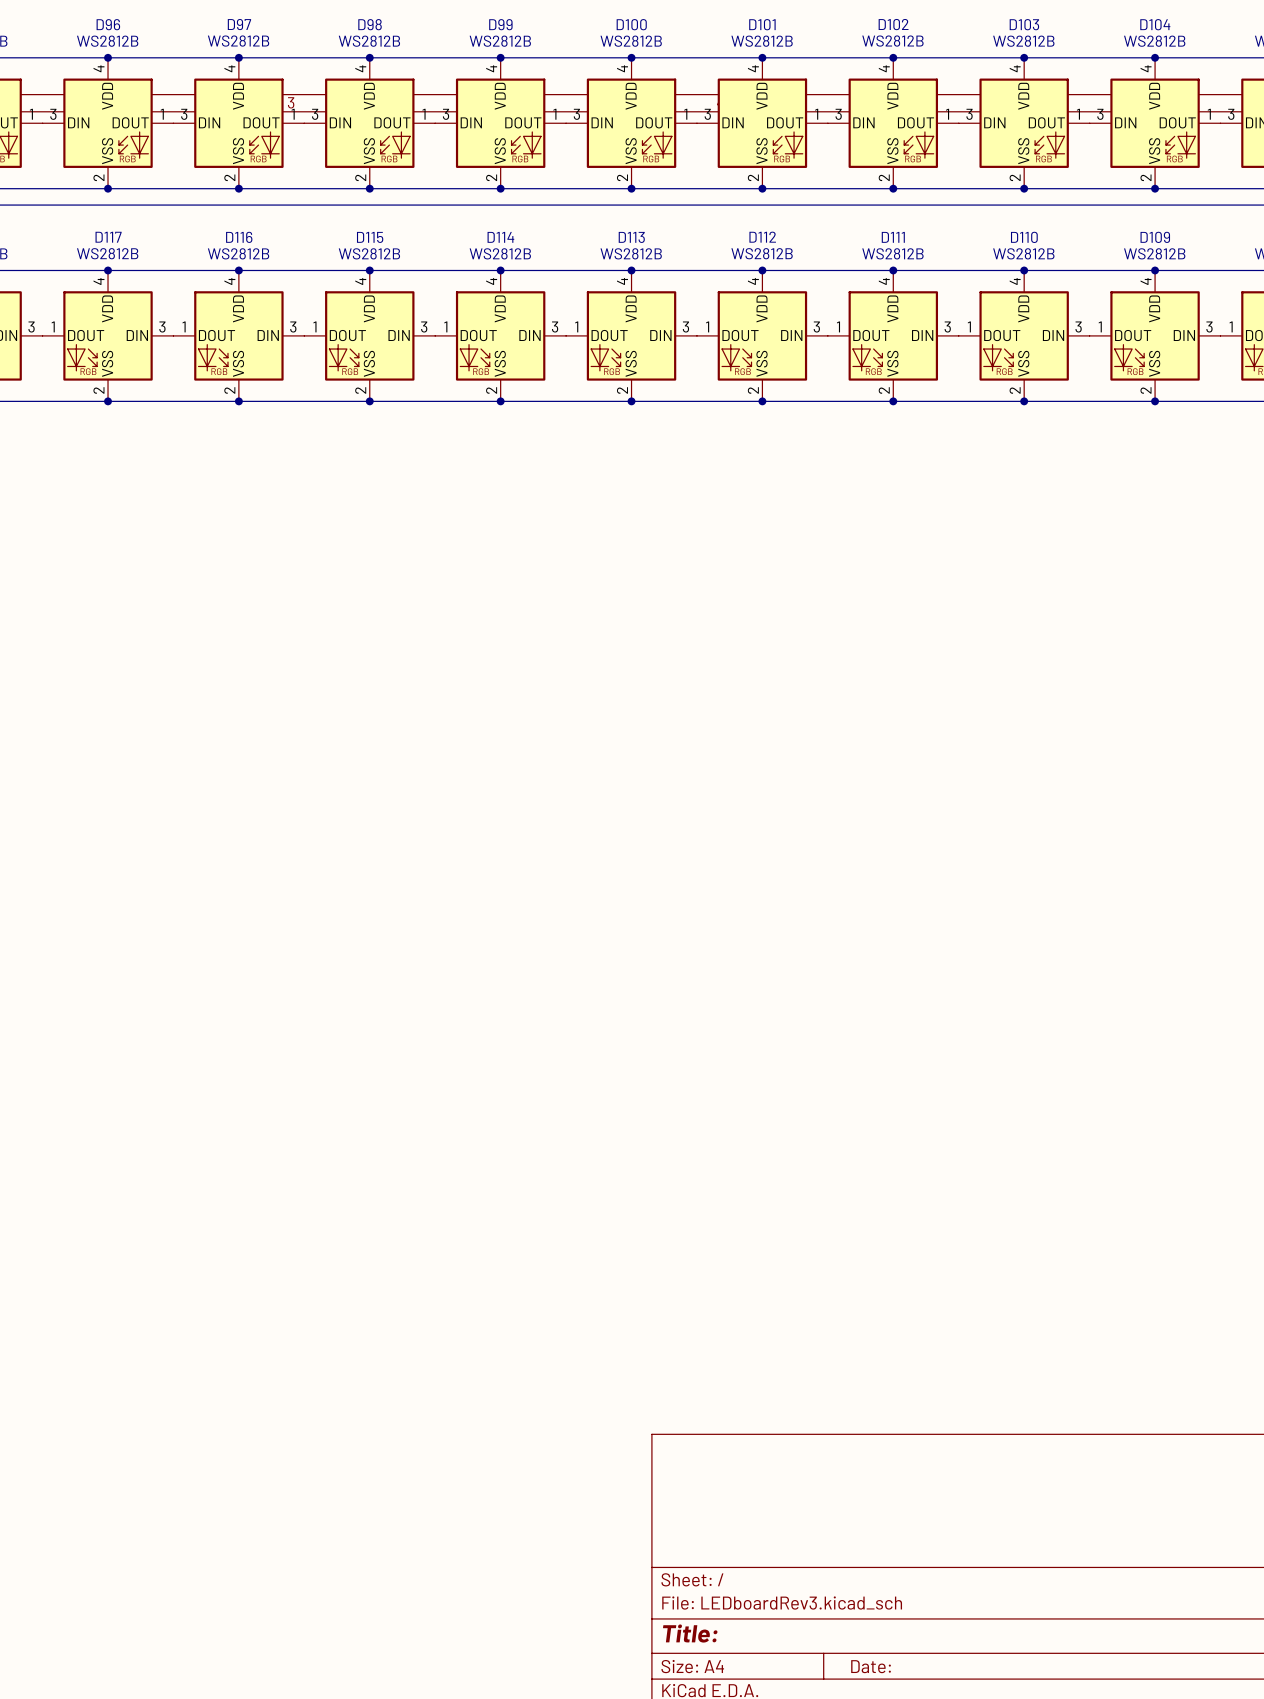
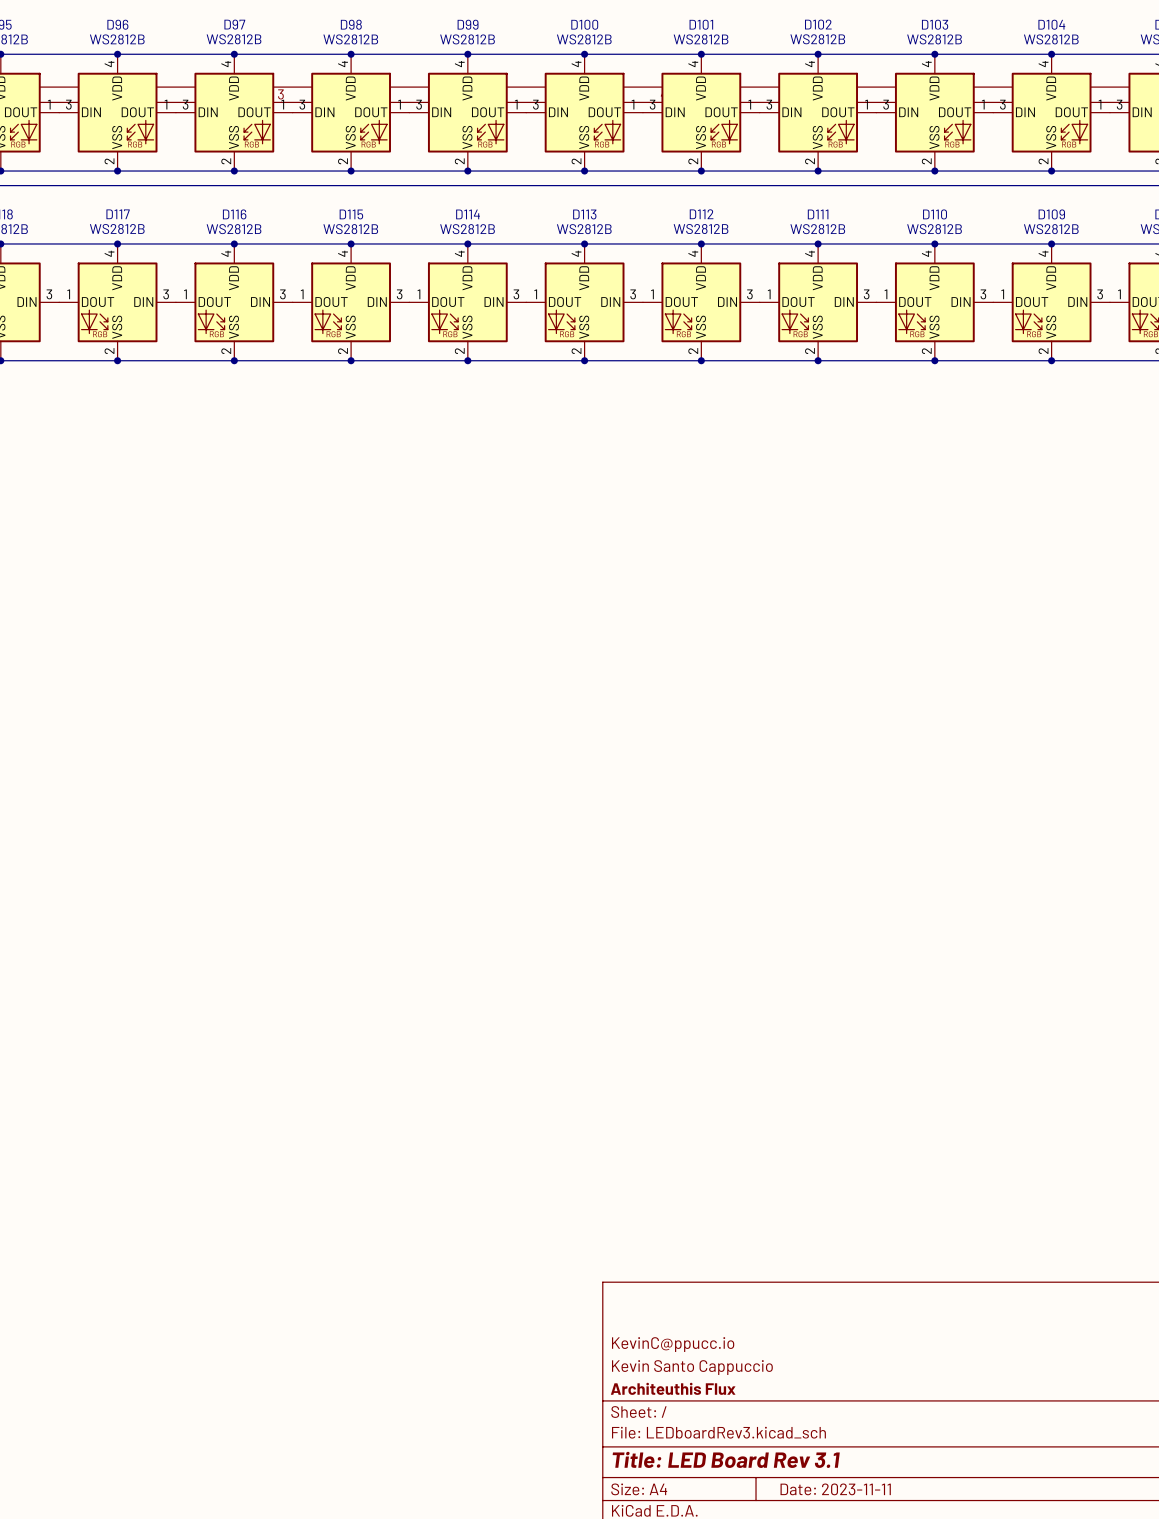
title block: none -> KevinC@ppucc.io (673, 1344)
title block: none -> Kevin Santo Cappuccio (692, 1367)
title block: none -> Architeuthis Flux (673, 1388)
title block: Title: (690, 1633) -> Title: LED Board Rev 3.1 (726, 1459)
title block: Date: (871, 1666) -> Date: 2023-11-11 (835, 1489)

